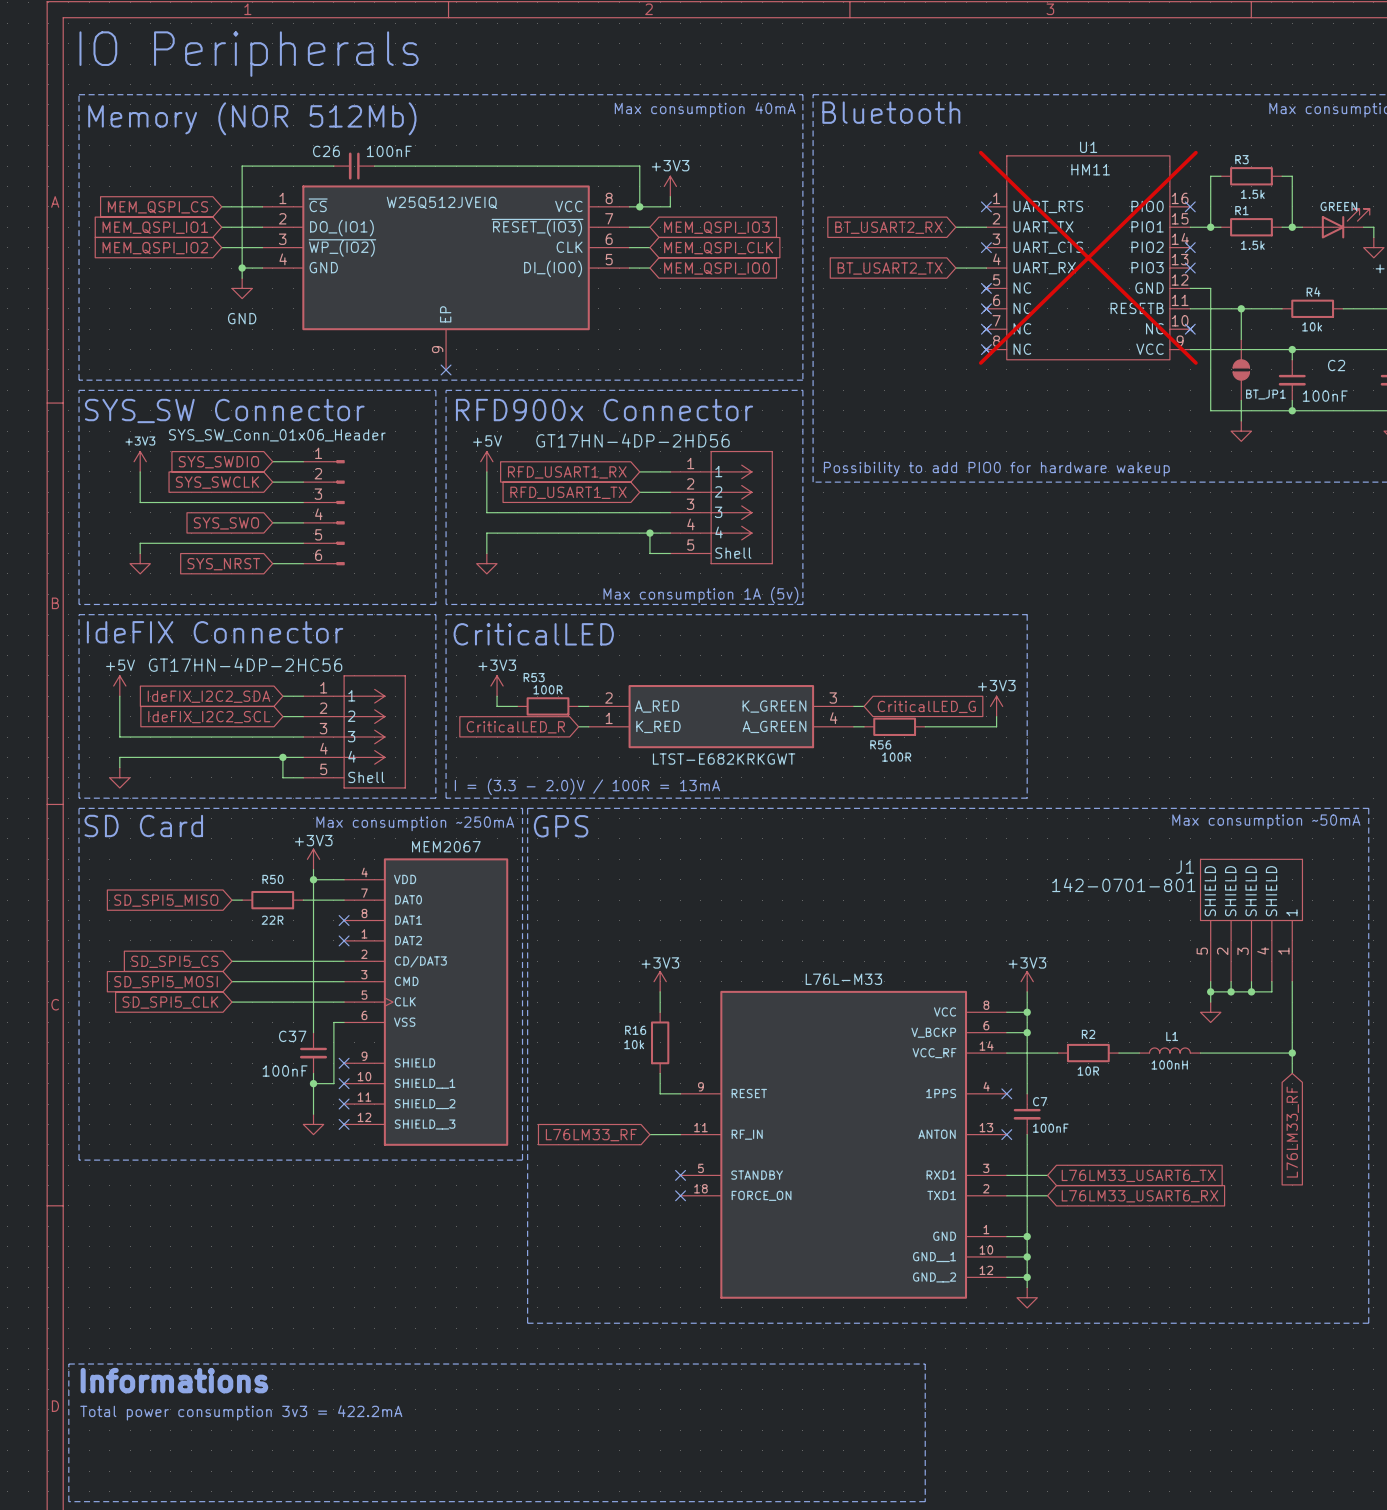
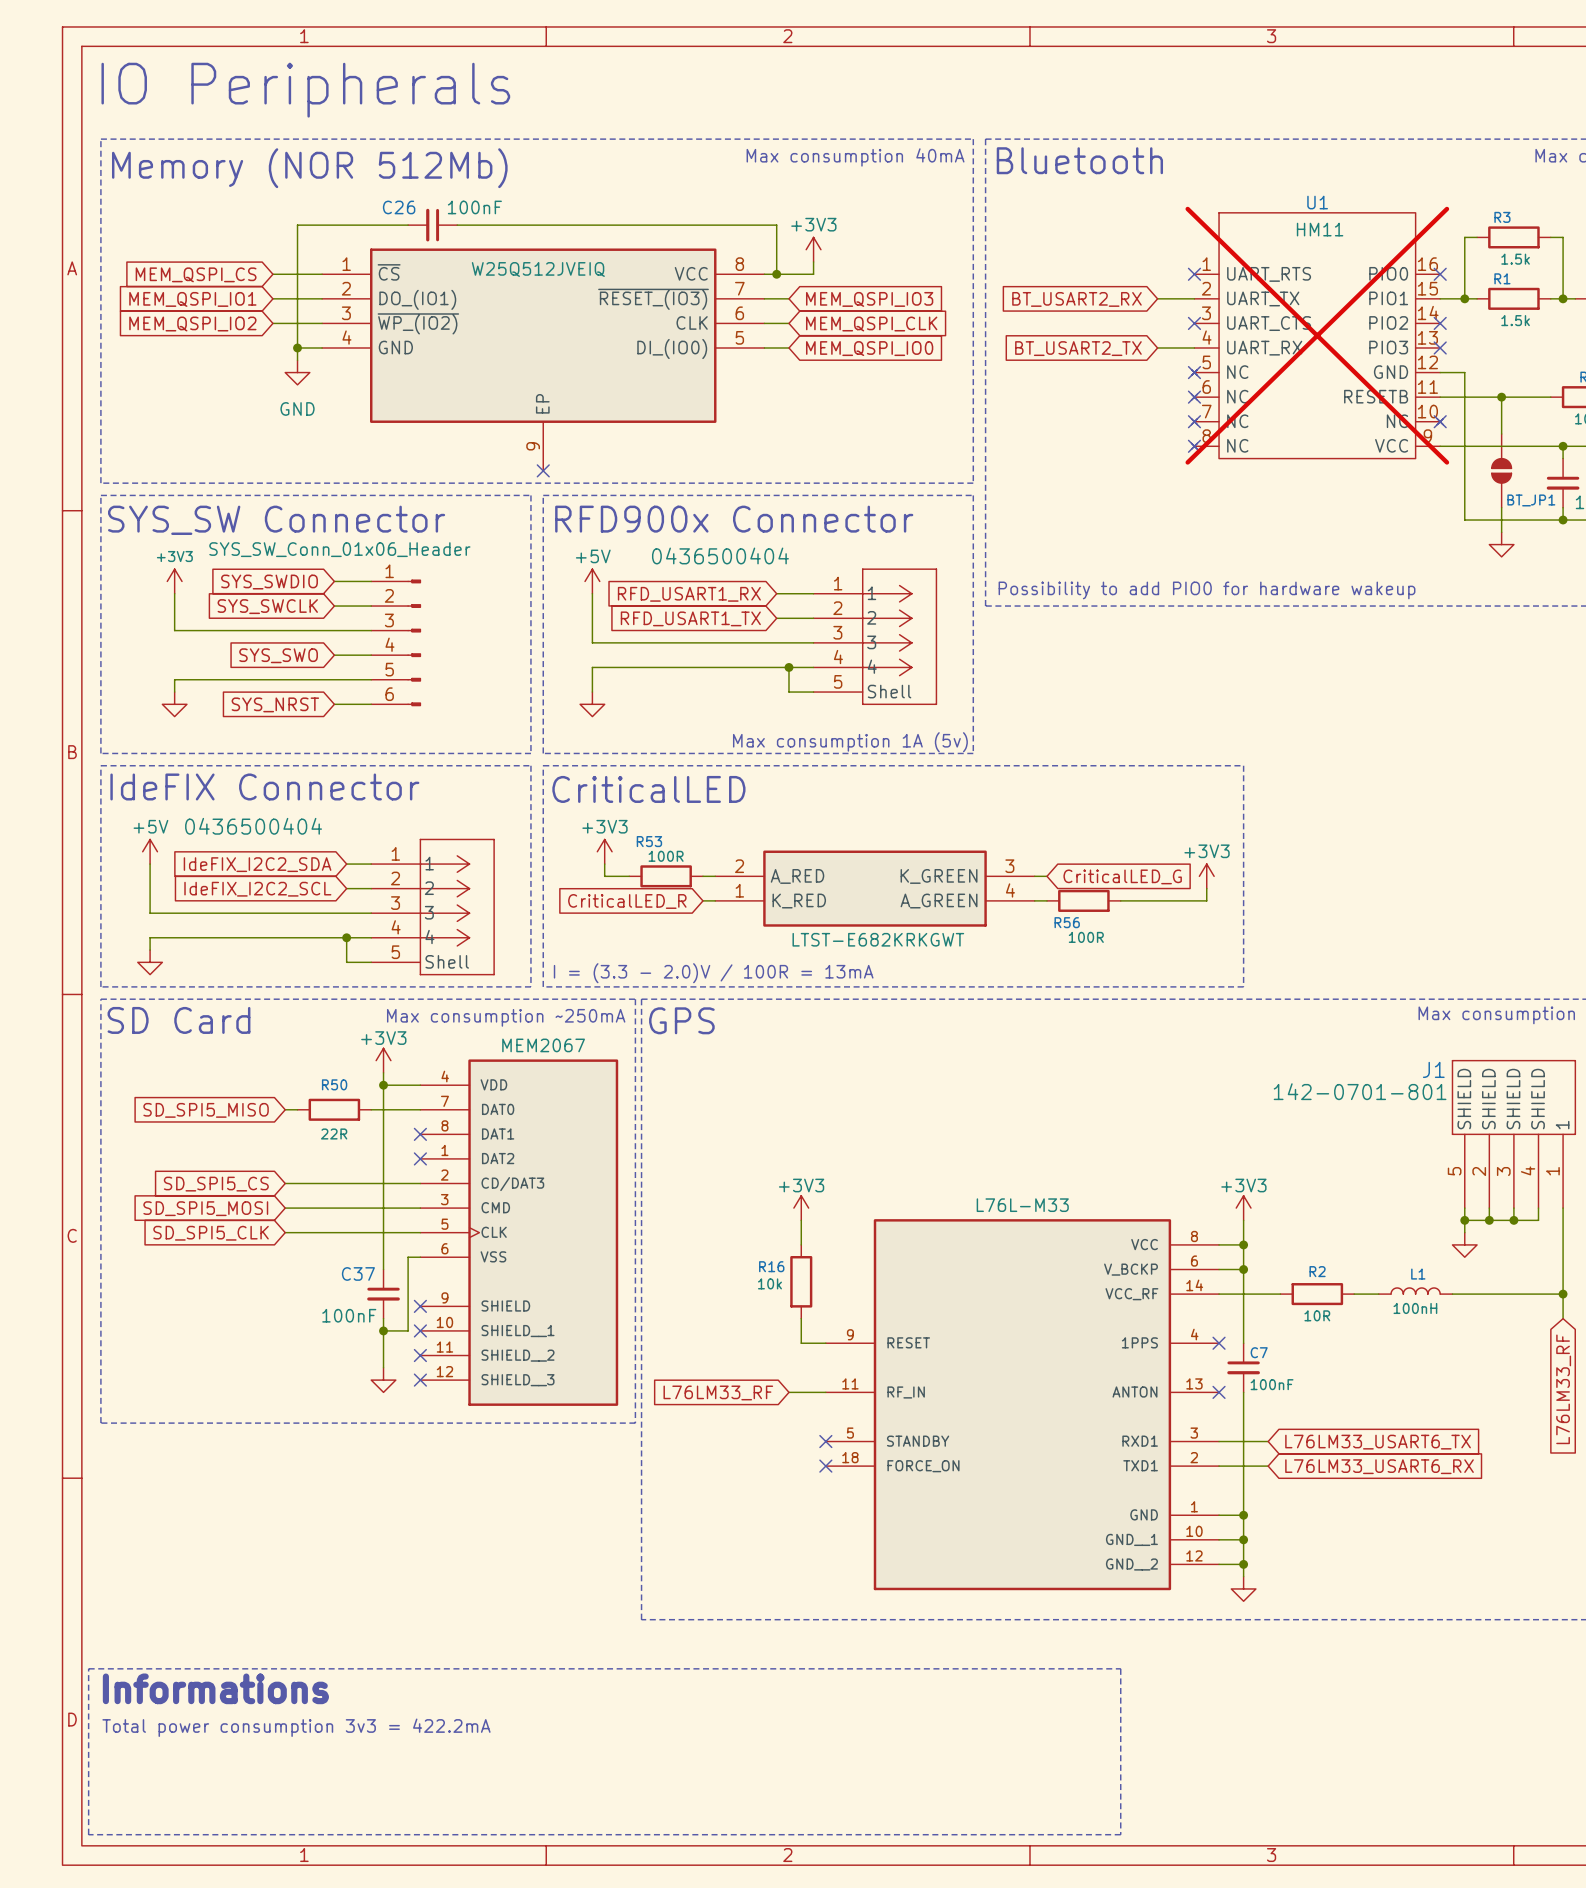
part value: GT17HN-4DP-2HD56 (632, 440) -> 0436500404 (720, 555)
part value: GT17HN-4DP-2HC56 (245, 664) -> 0436500404 (253, 826)

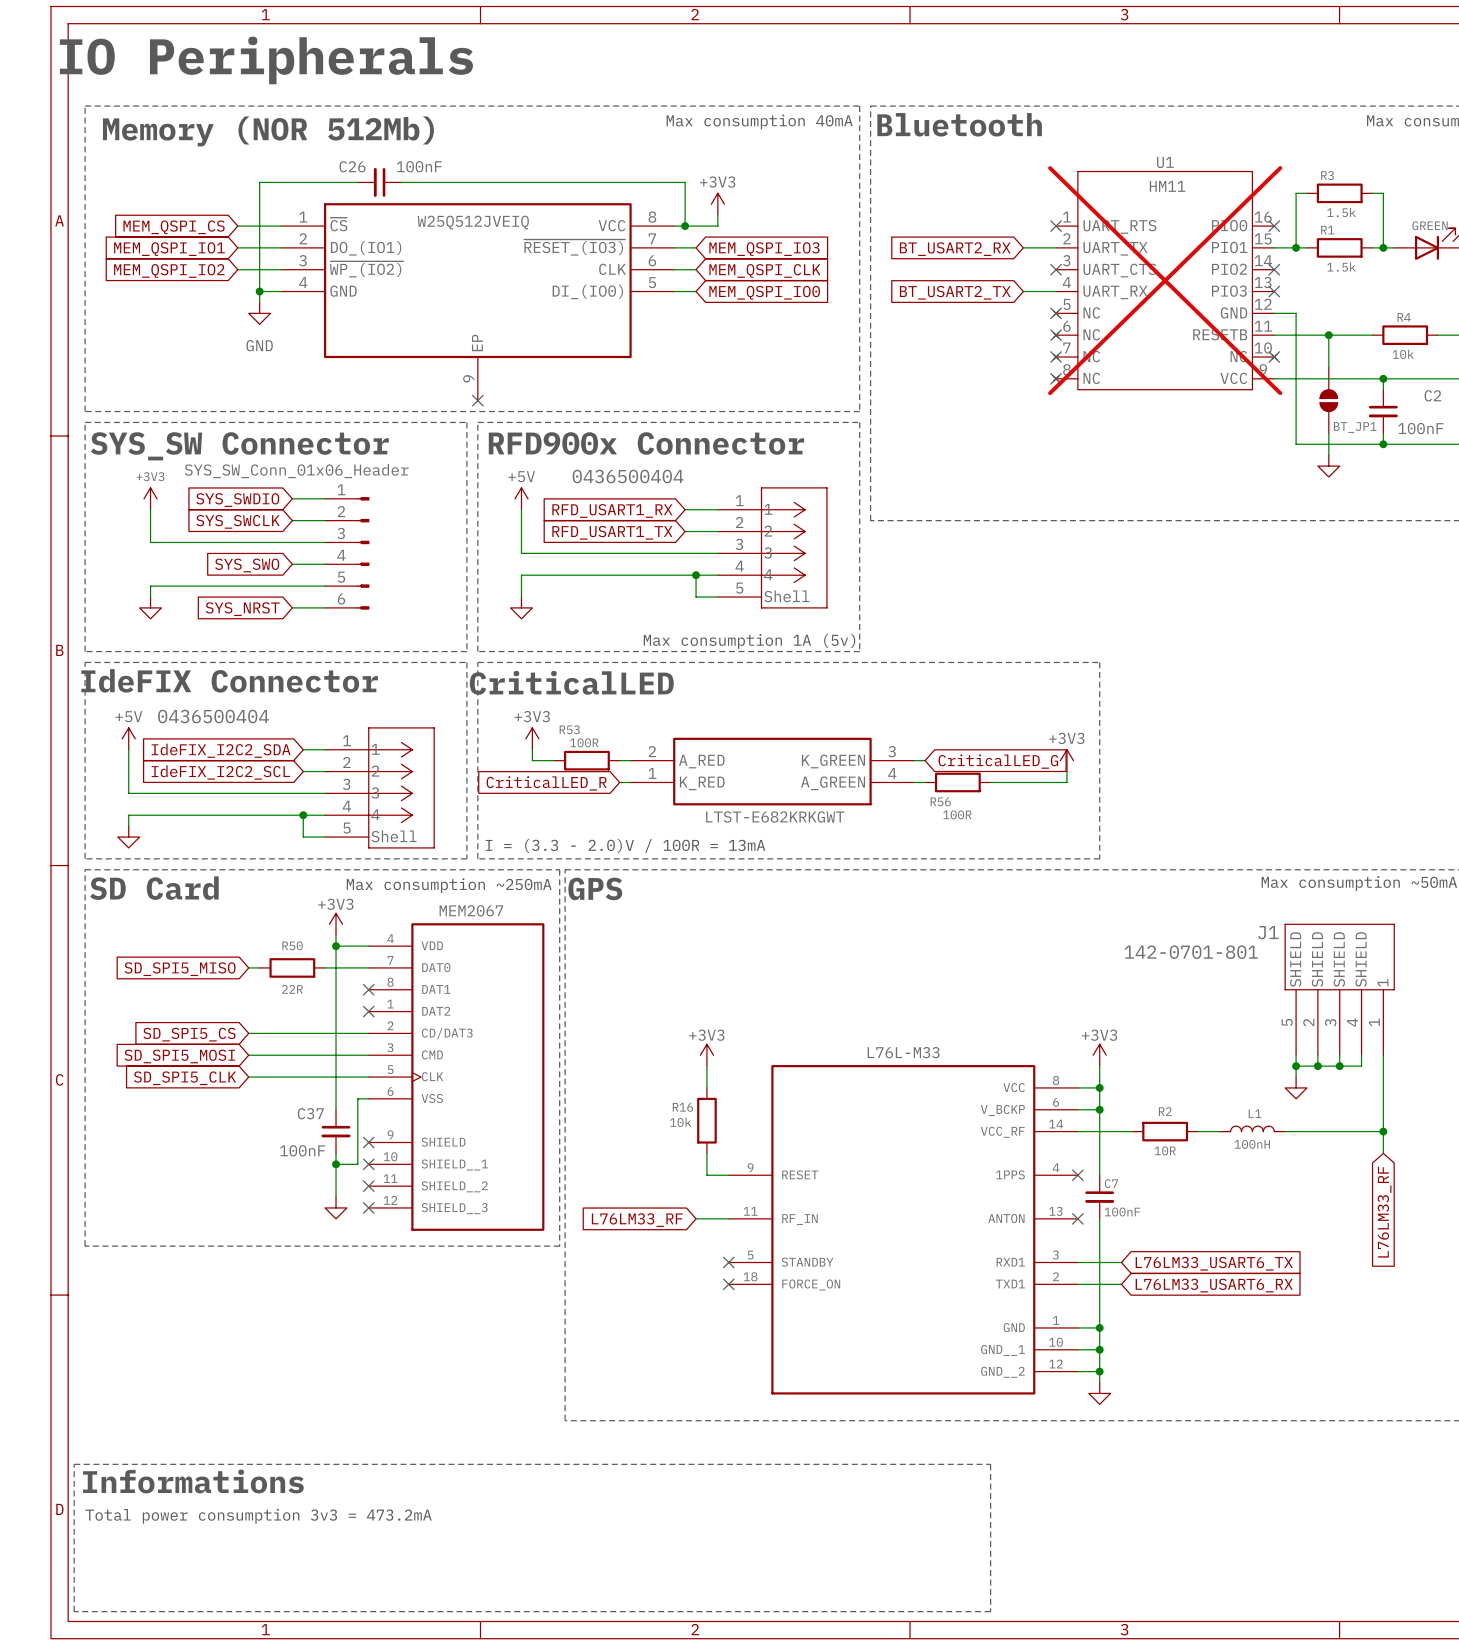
text: Possibility to add PIO0 for hardware wakeup (1207, 590) -> none
text: Total power consumption 3v3 = 422.2mA (296, 1727) -> Total power consumption 3v3 = 473.2mA (258, 1516)

